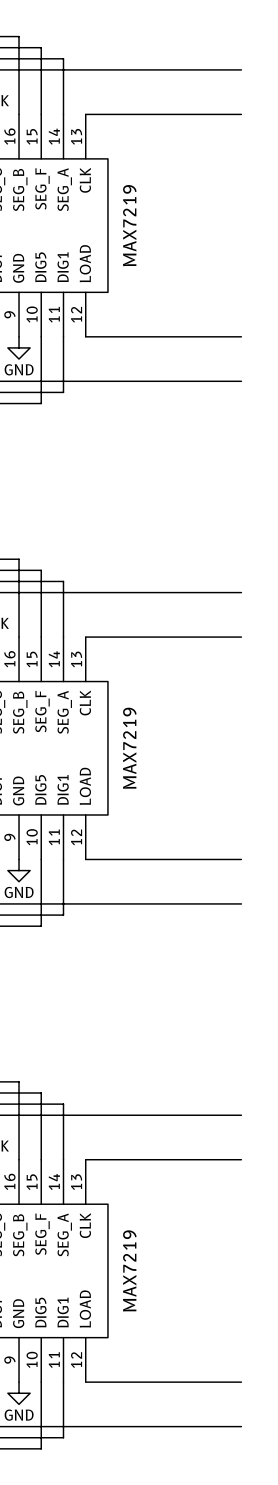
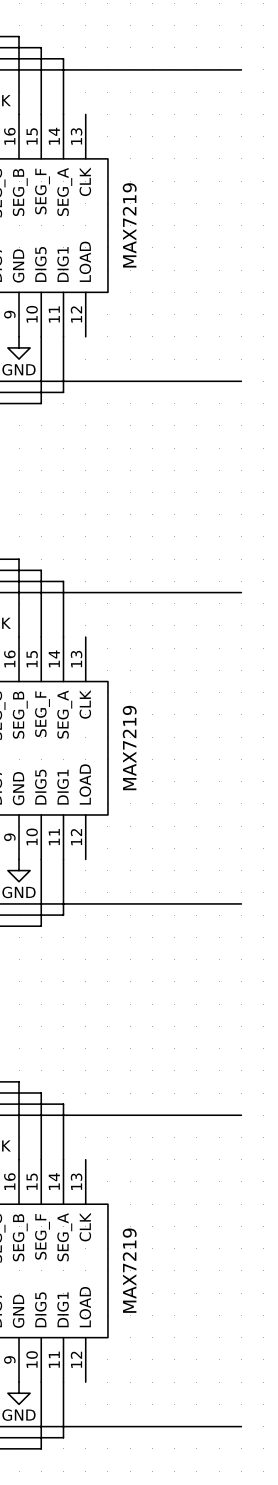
wire: (85, 114) (241, 114) -> none
wire: (85, 336) (241, 336) -> none
wire: (85, 637) (241, 637) -> none
wire: (85, 859) (241, 859) -> none
wire: (85, 1159) (241, 1159) -> none
wire: (85, 1382) (241, 1382) -> none

